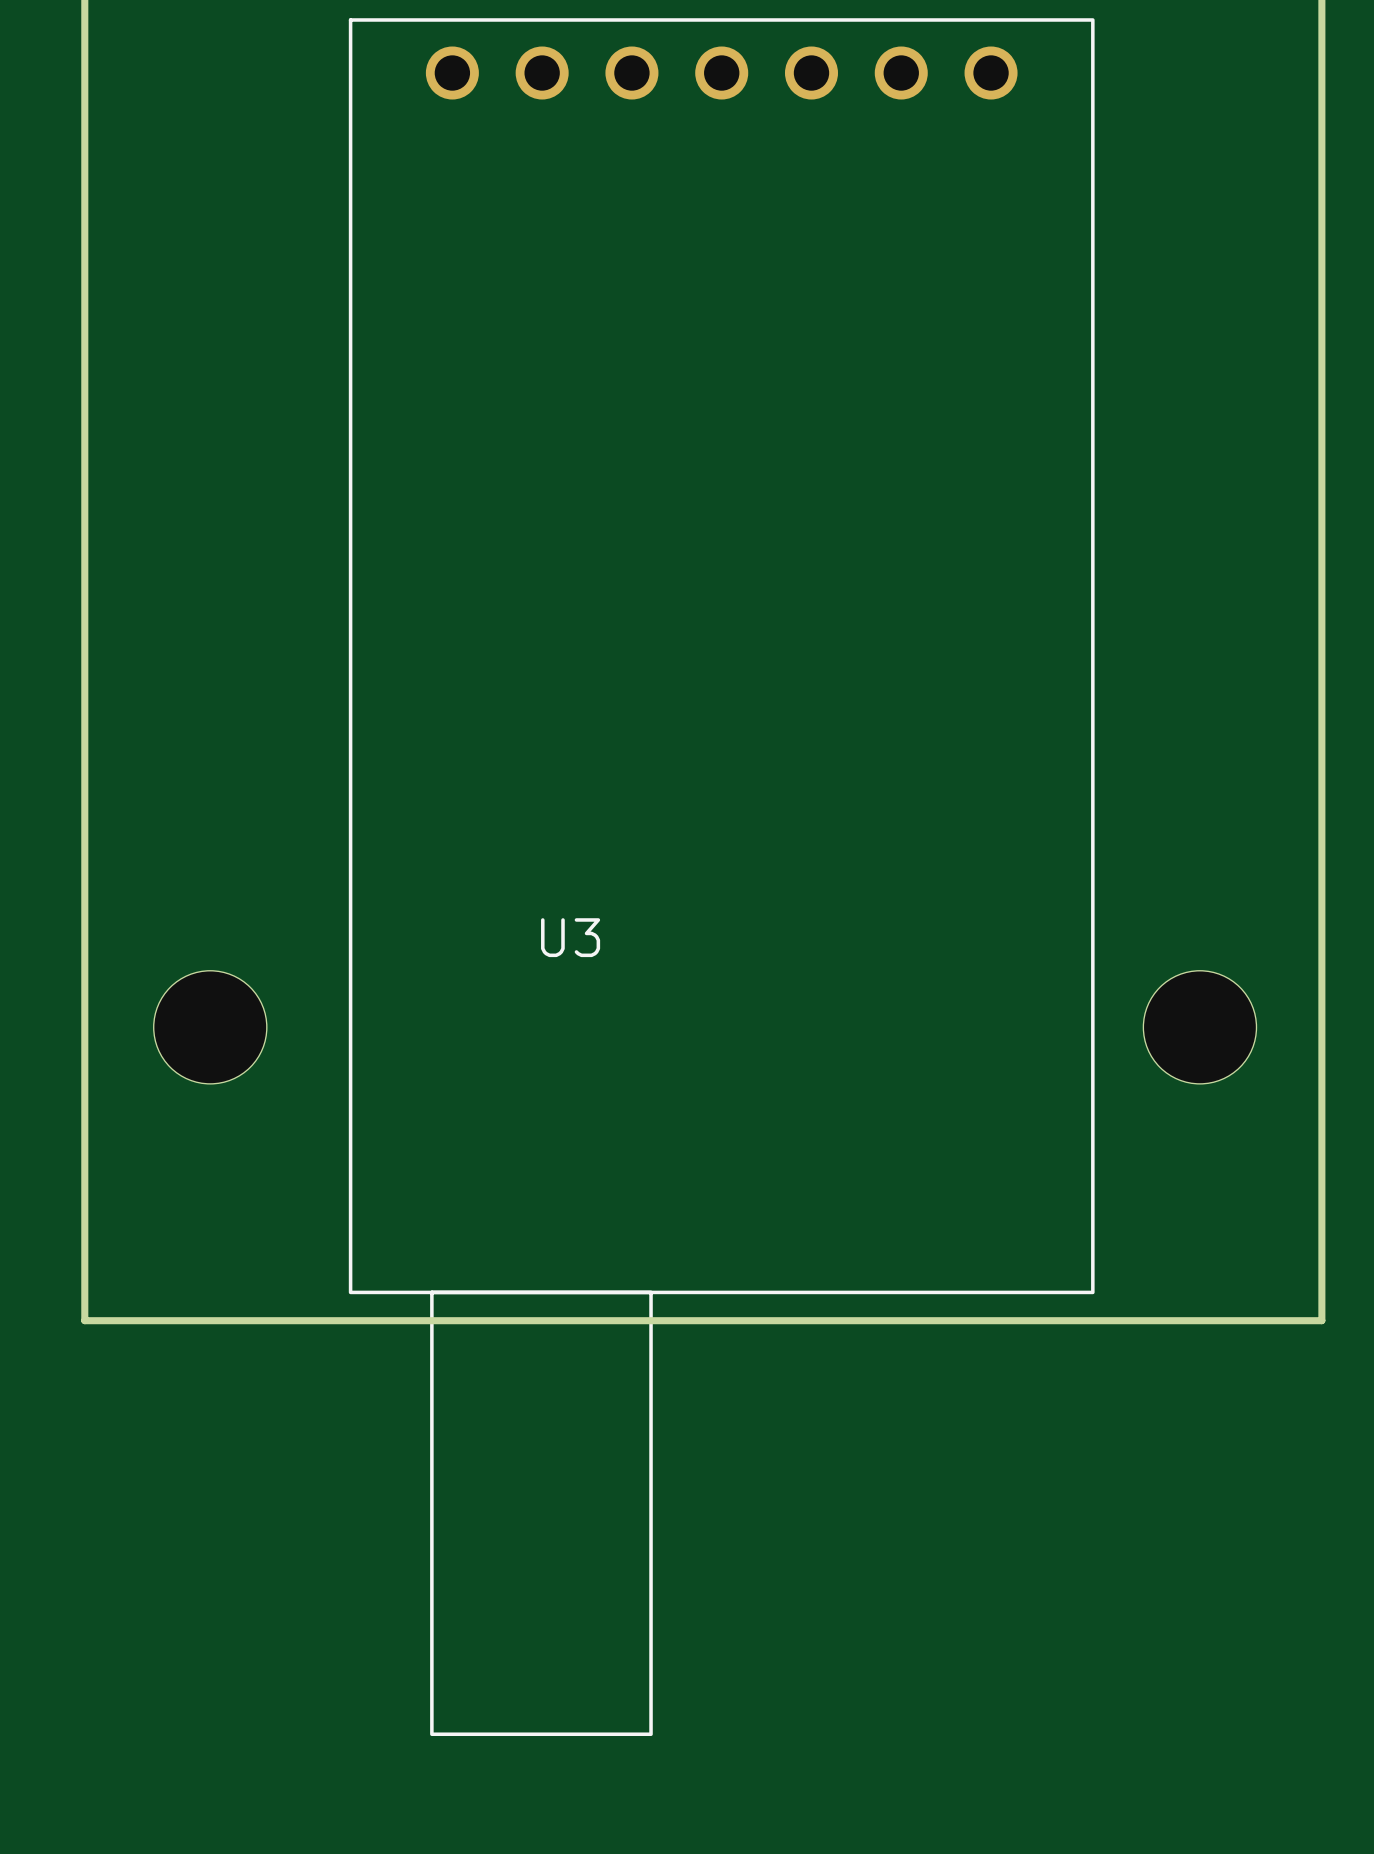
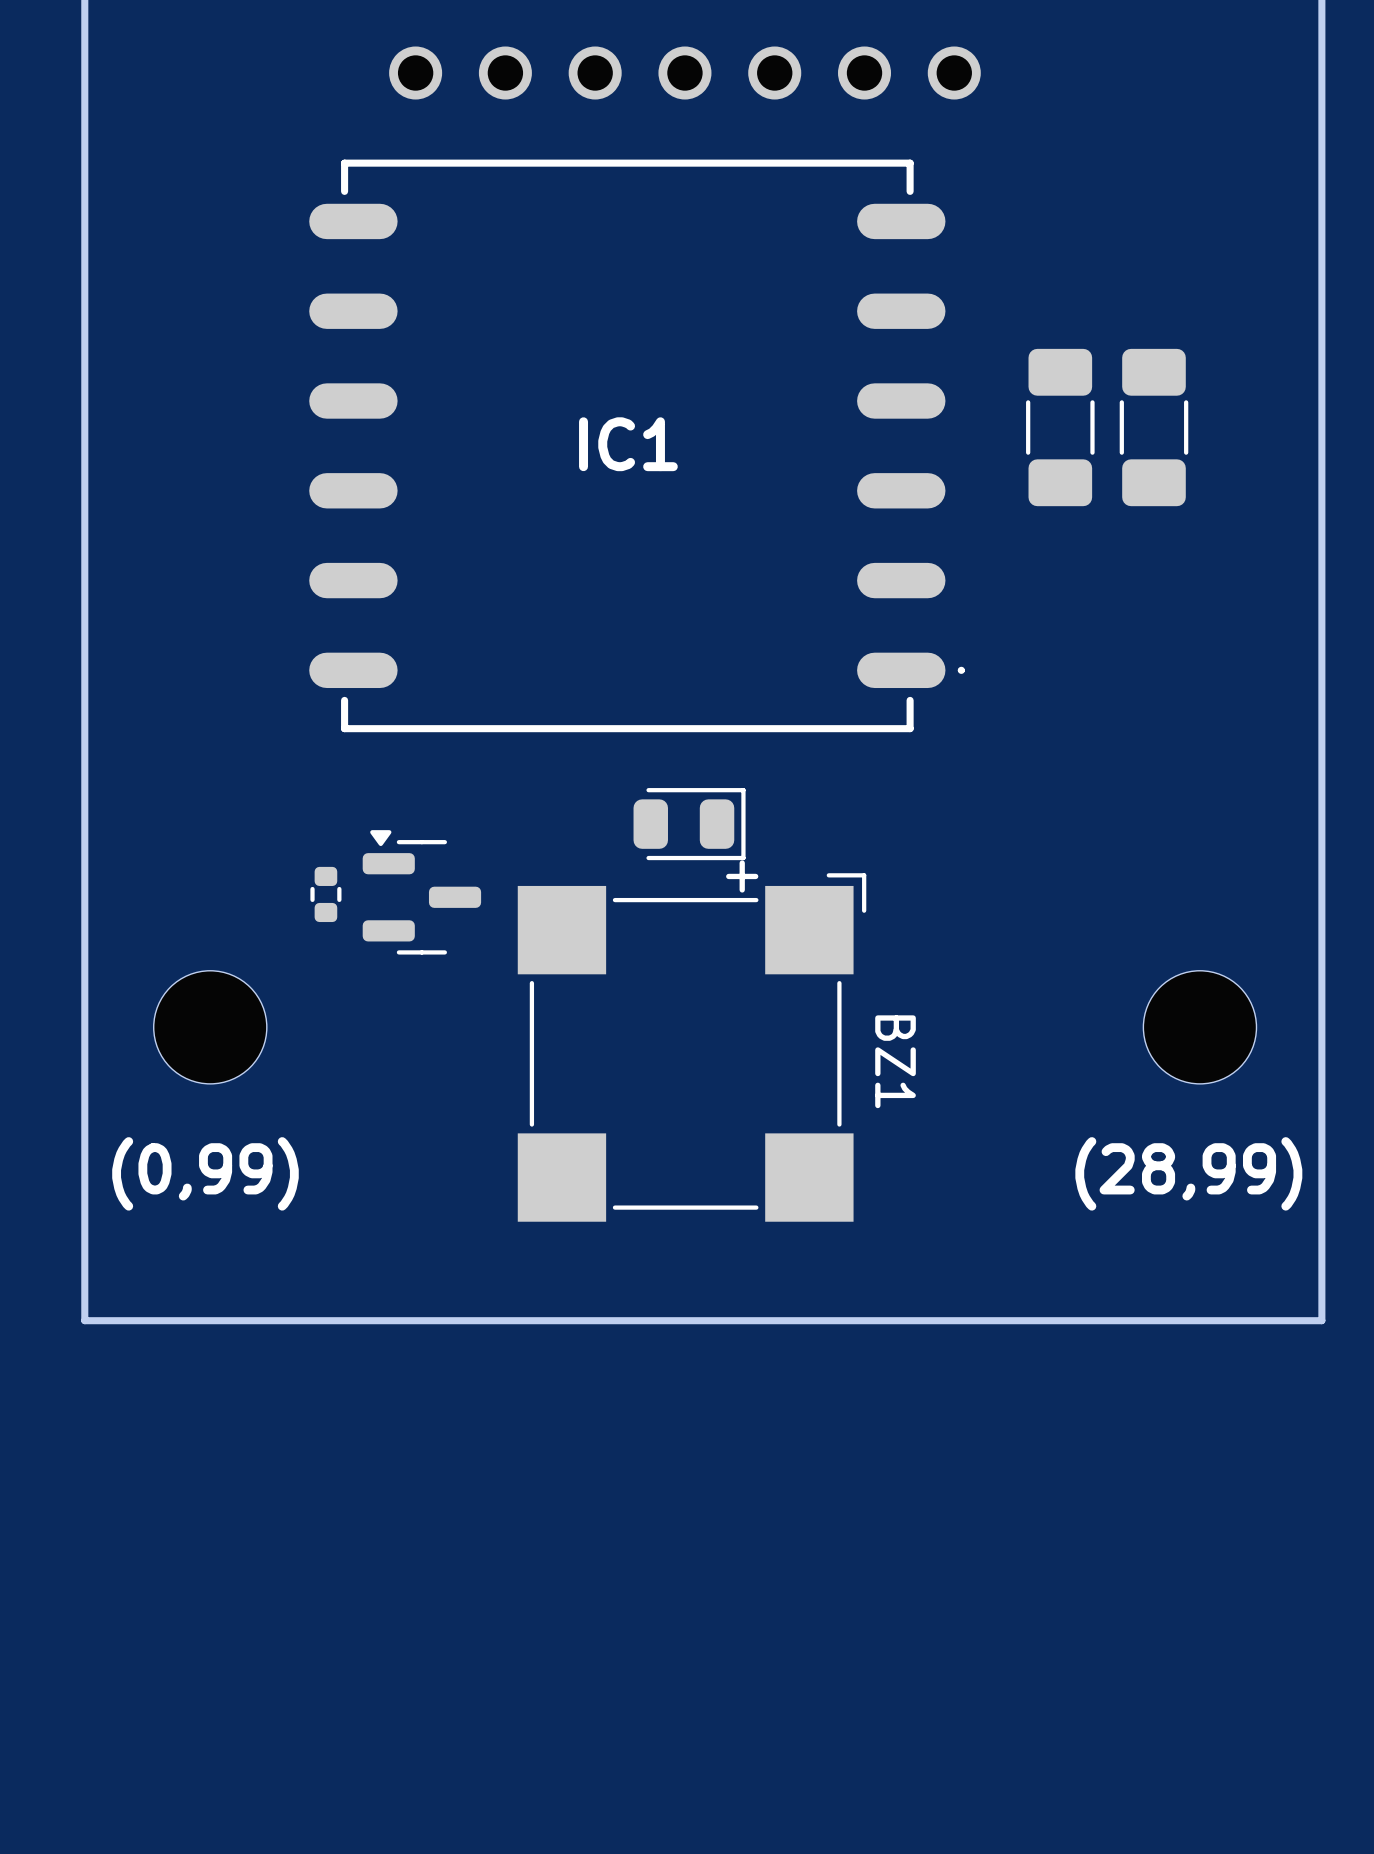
part: none -> (1060, 427)
part: none -> (1153, 427)
IC1: none -> (637, 445)
part: none -> (689, 824)
U3 side: bottom (721, 877) -> top (684, 73)
part: none -> (421, 892)
part: none -> (325, 894)
BZ1: none -> (692, 1047)
text: none -> (0,99) (205, 1173)
text: none -> (28,99) (1188, 1173)

